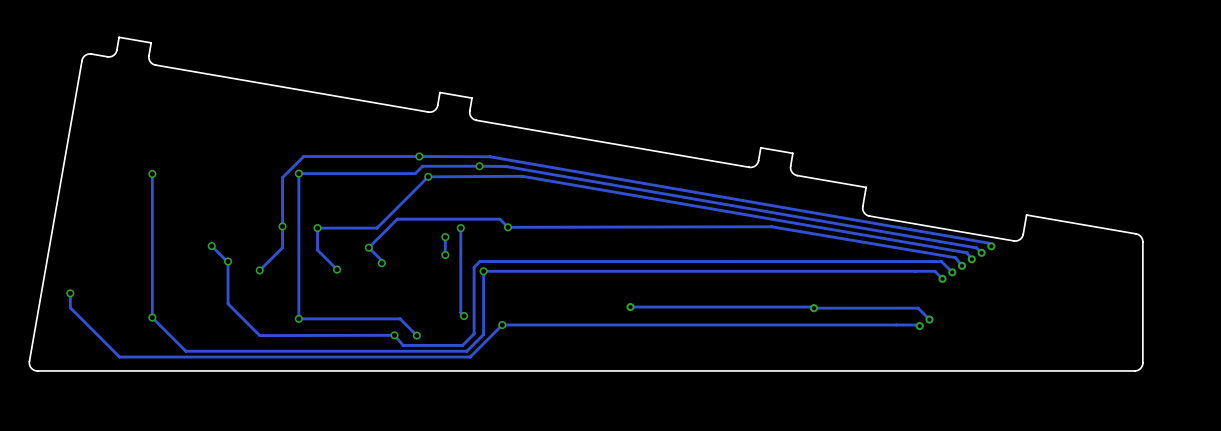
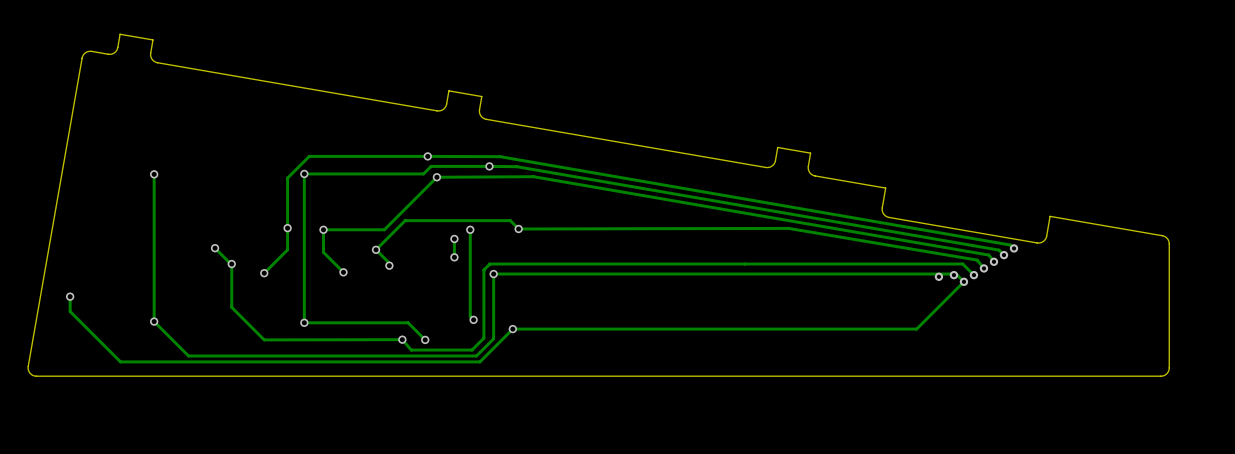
via: none -> (953, 275)
via: none -> (938, 276)
track: (630, 307) (918, 308) (929, 319) -> none
via: (630, 307) -> none
via: (813, 308) -> none
via: (929, 319) -> none
track: (896, 324) (919, 326) -> (916, 329) (963, 281)
via: (919, 326) -> none

